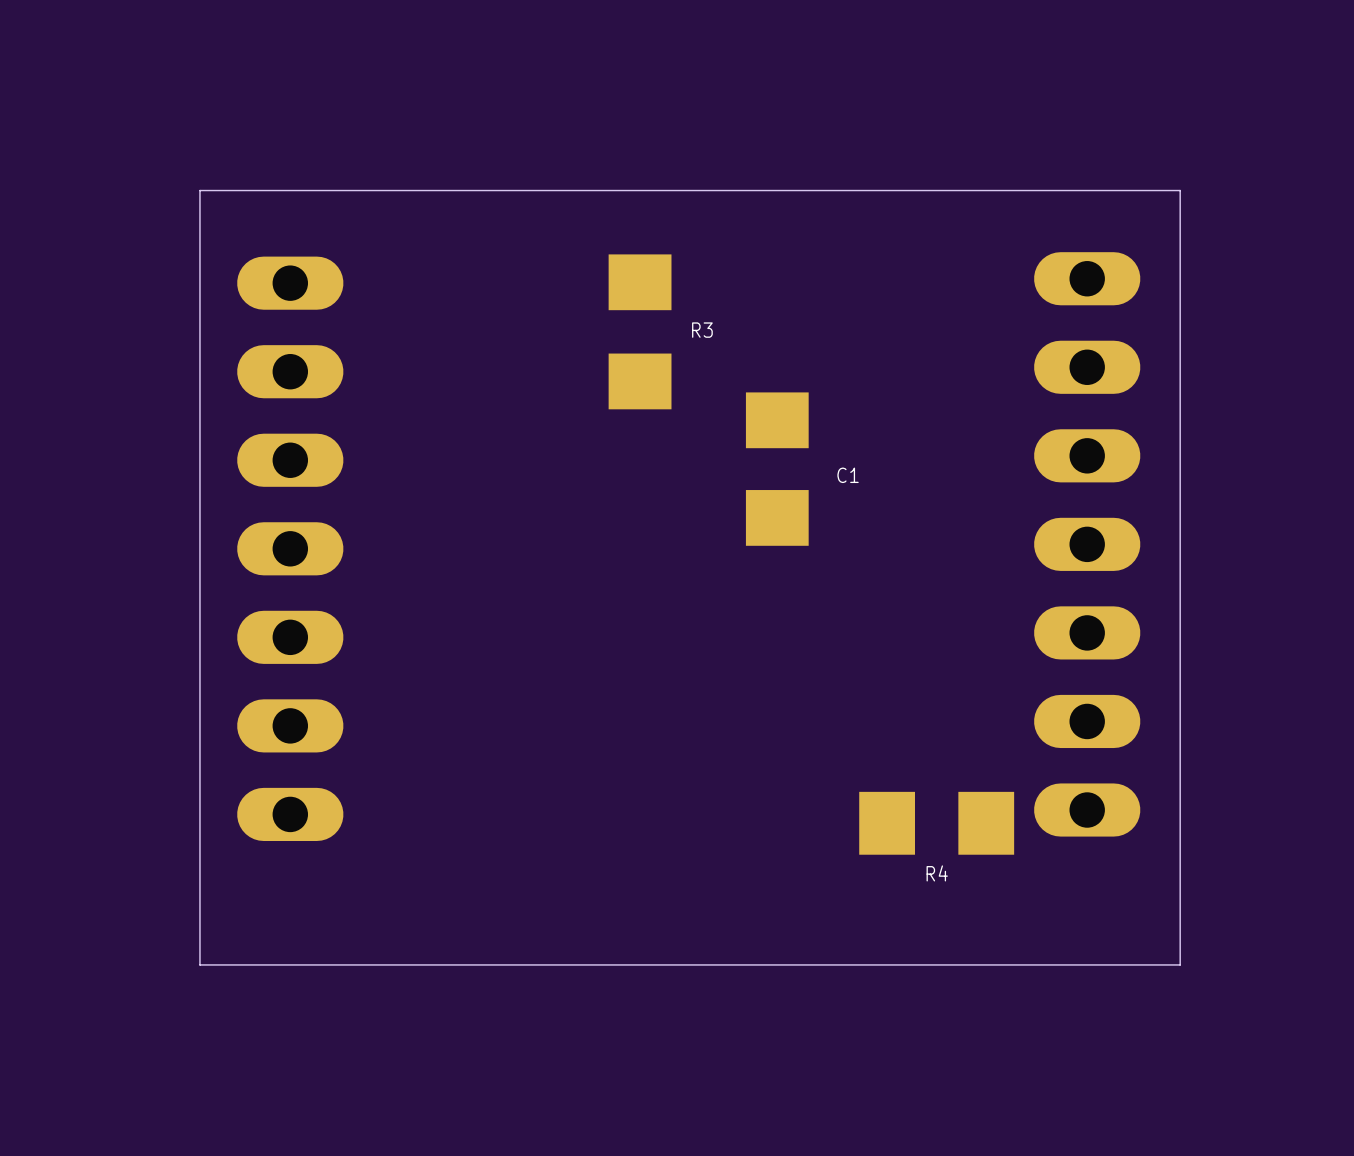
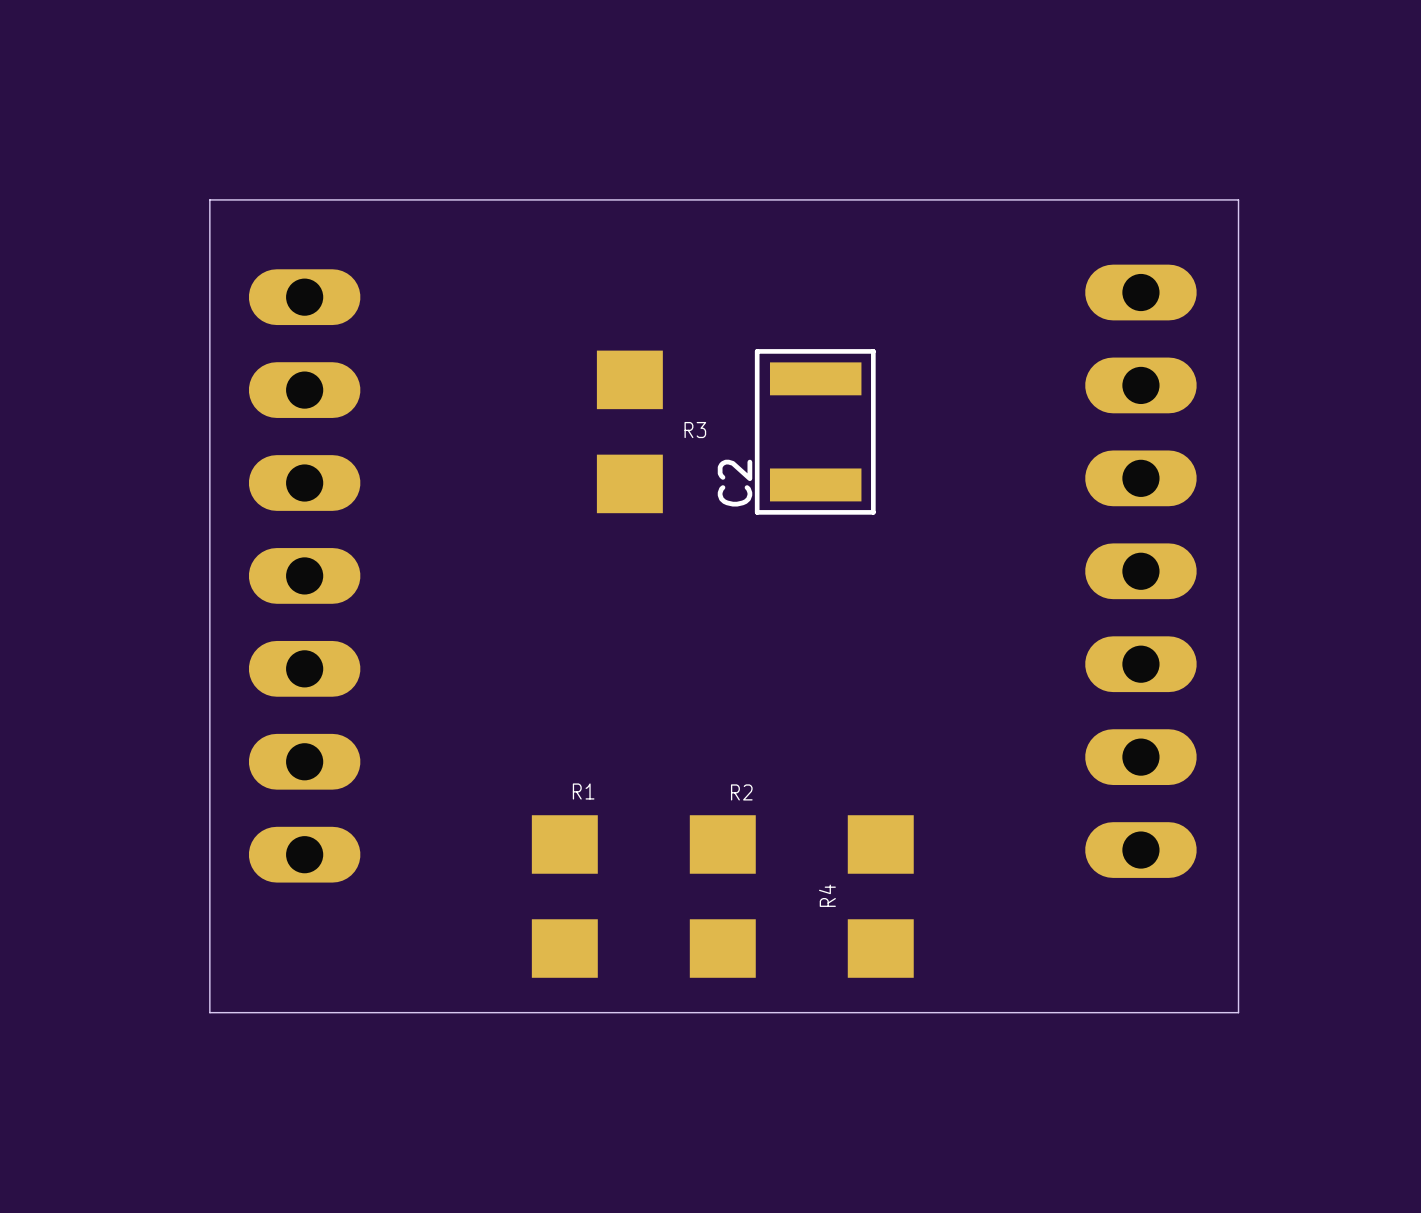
R3 position: (640, 331) -> (629, 431)
C2: none -> (815, 431)
C1: (777, 469) -> none
R4 rotation: 0° (936, 823) -> 90° clockwise (880, 896)
R4 position: (936, 823) -> (880, 896)
R1: none -> (564, 896)
R2: none -> (722, 896)

